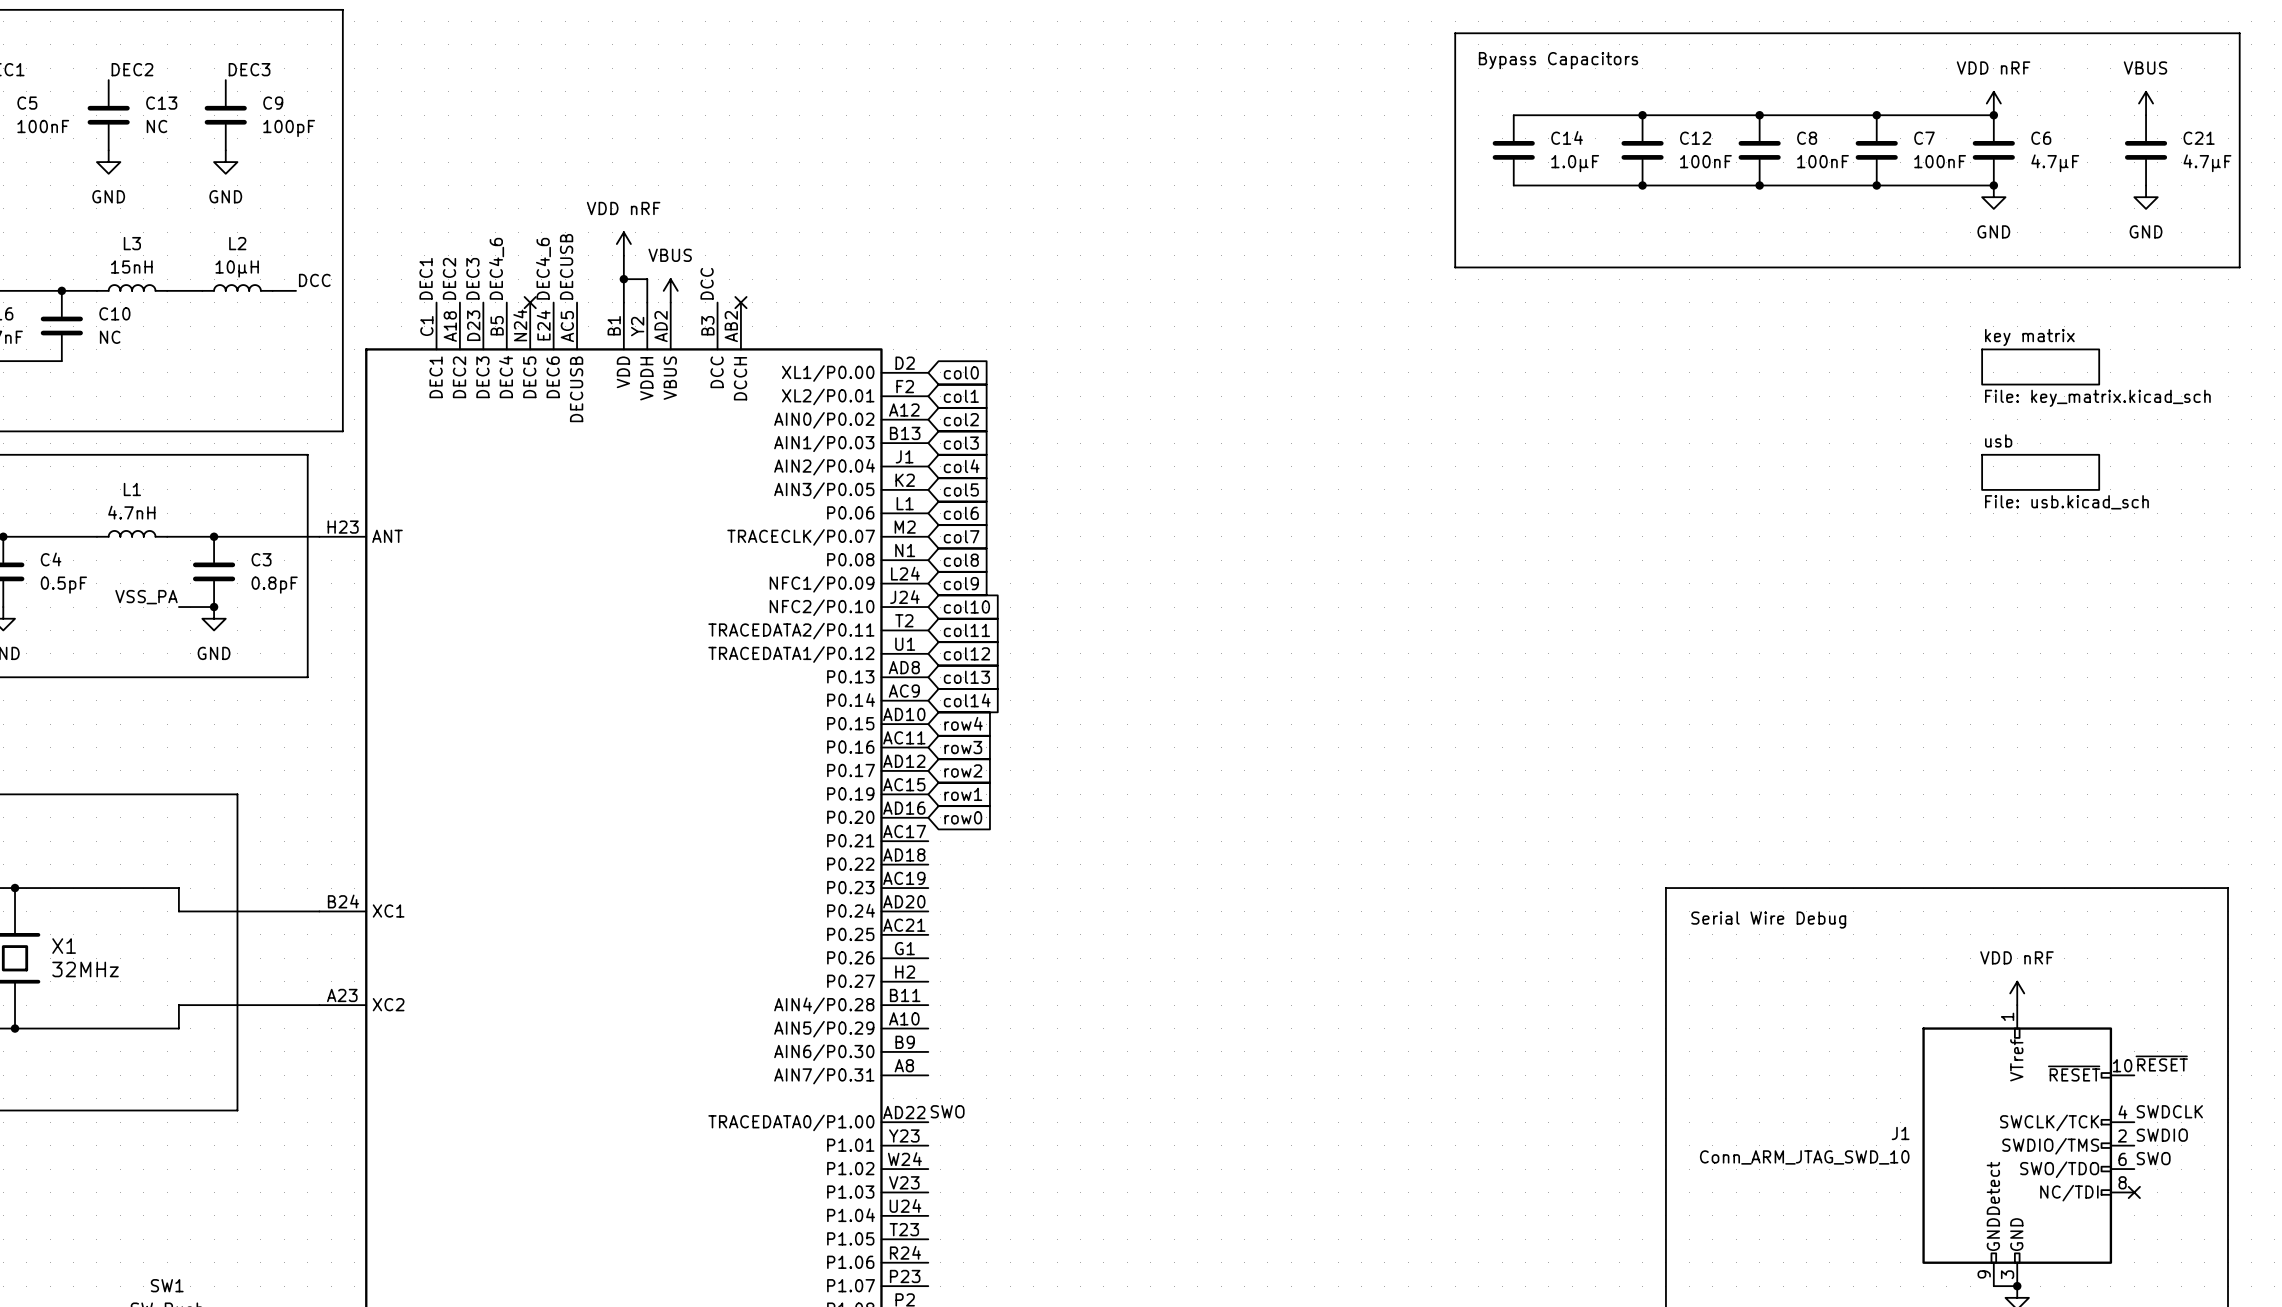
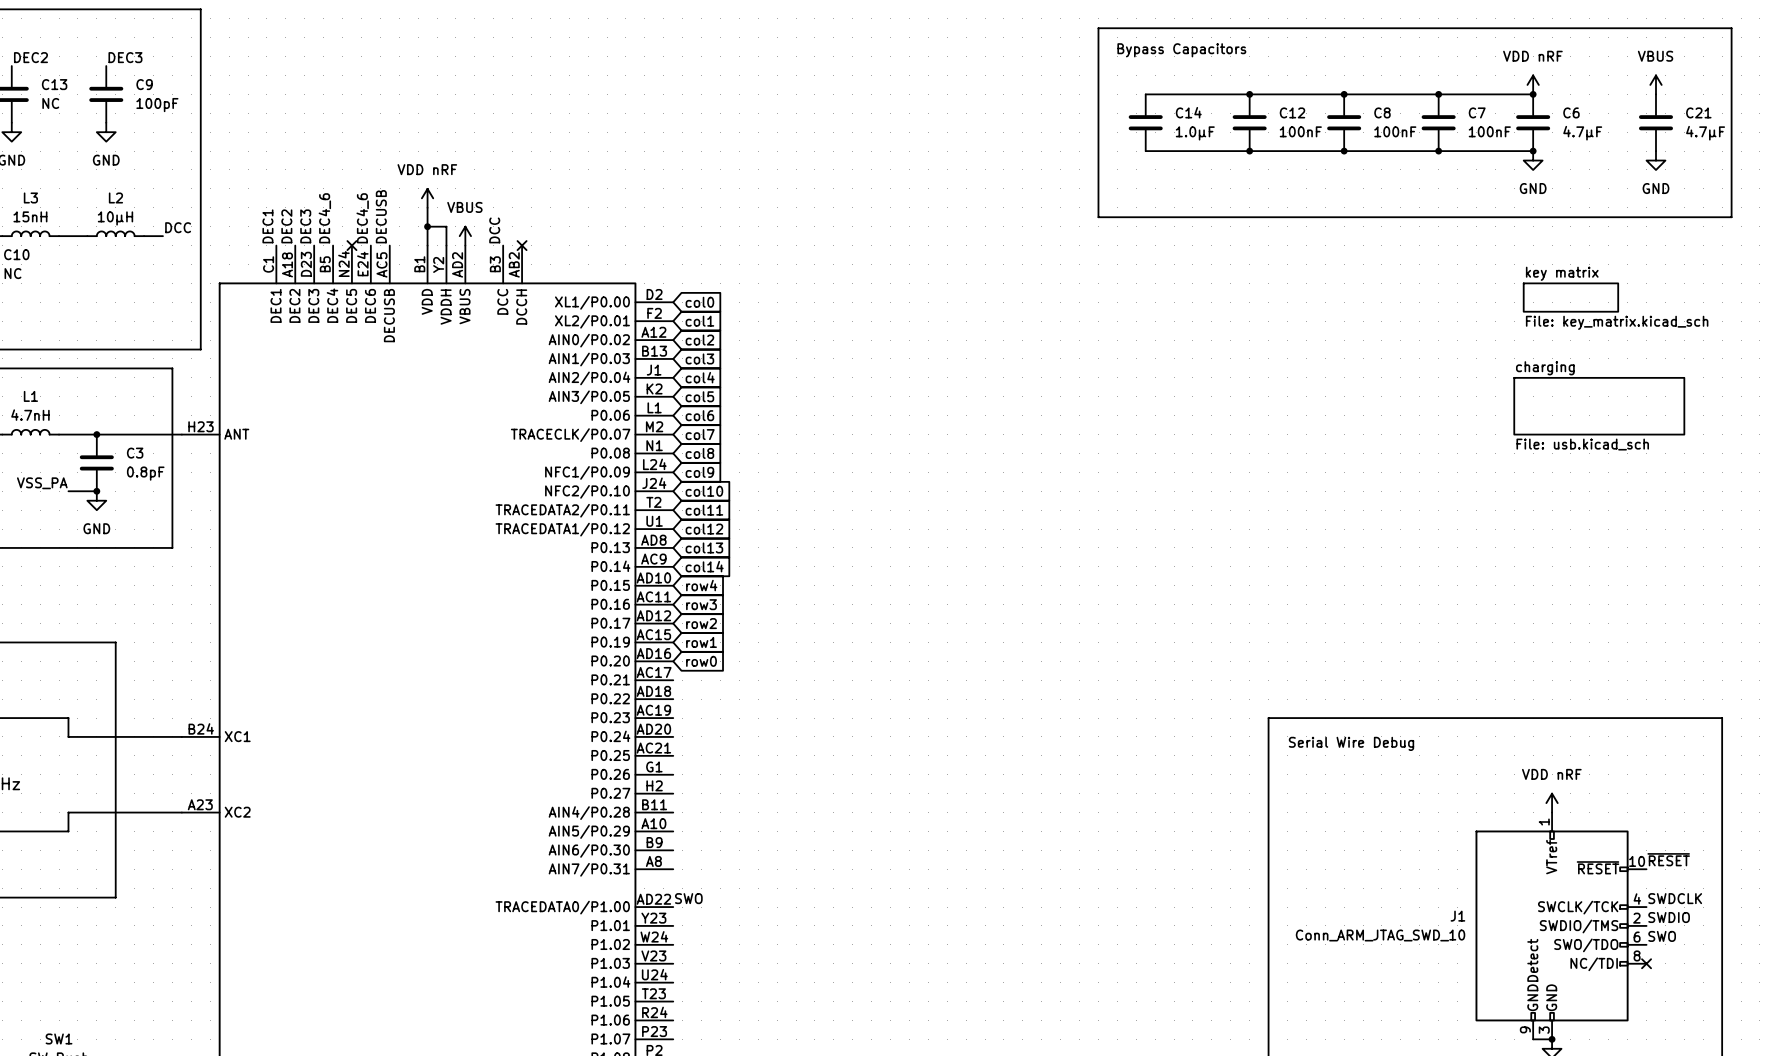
sheet usb: File: usb.kicad_sch (2040, 472) -> none
sheet charging: none -> File: usb.kicad_sch (1599, 406)

